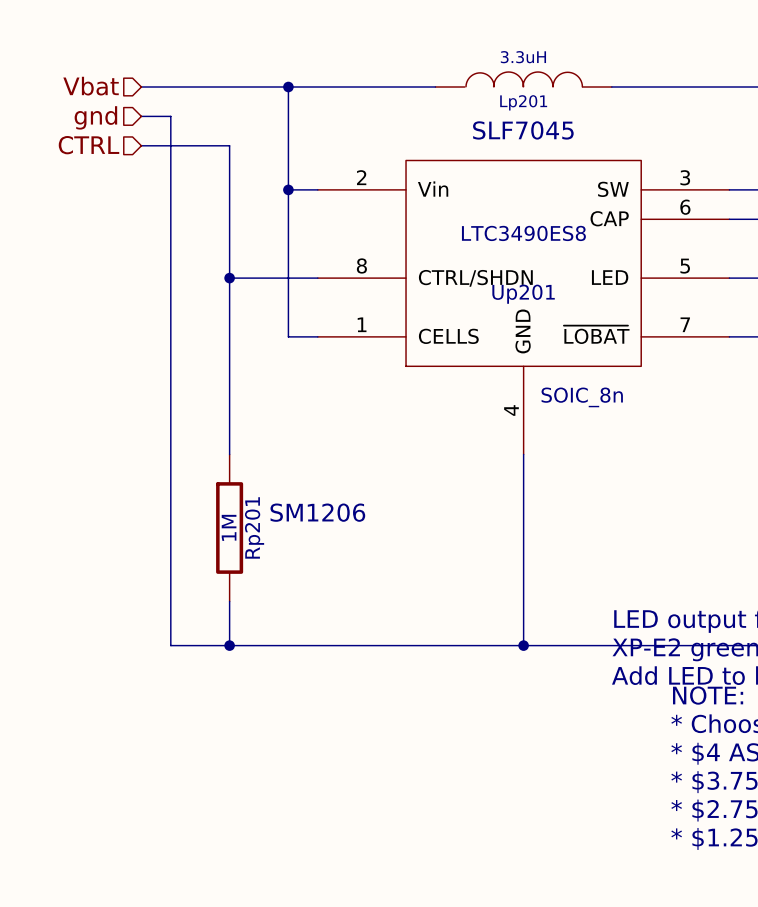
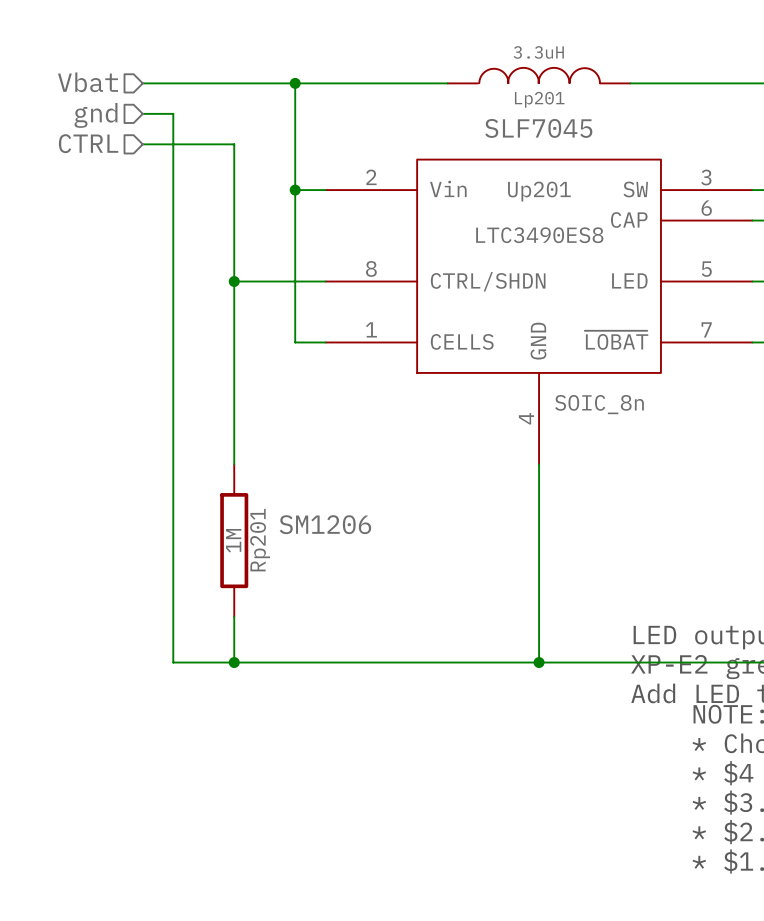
Up201 name position: Up201 (523, 294) -> Up201 (539, 191)

